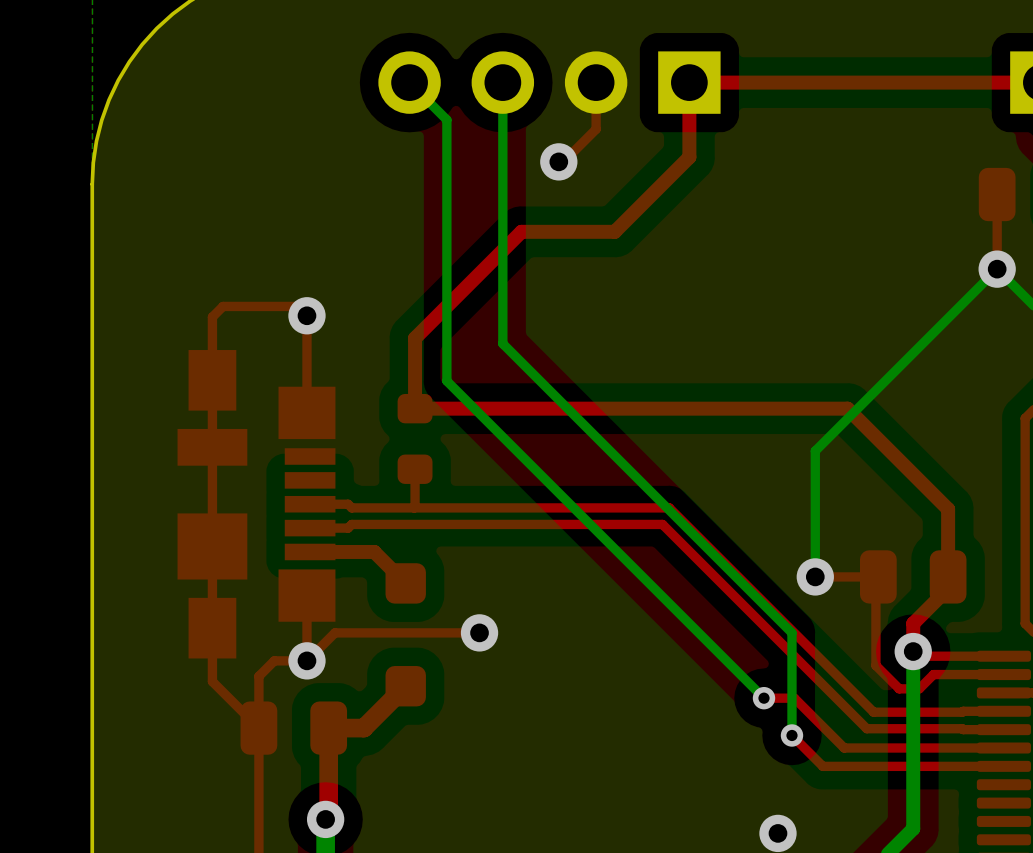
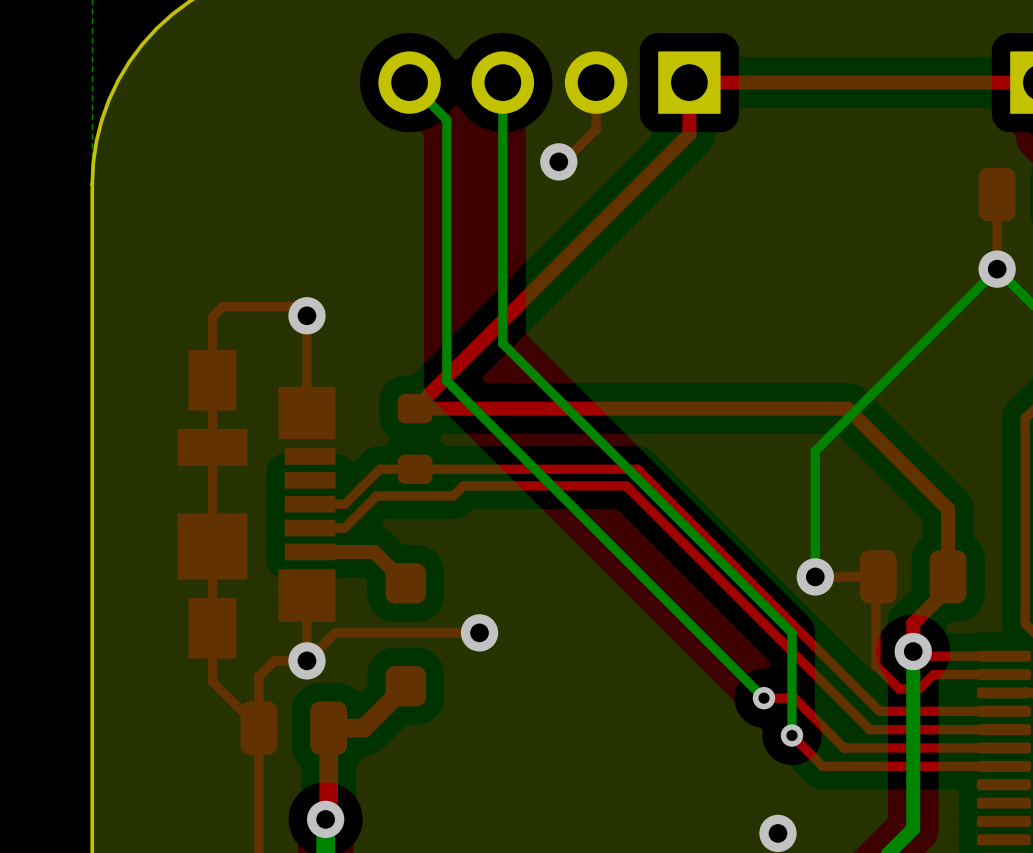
top track: (689, 134) (689, 157) (614, 231) (521, 231) (415, 338) (415, 408) -> (689, 134) (415, 408)
top track: (415, 469) (414, 507) -> none
top track: (344, 504) (348, 504) (351, 507) (669, 507) (873, 712) (963, 711) -> (344, 504) (379, 469) (637, 469) (879, 711) (963, 711)
top track: (344, 528) (348, 528) (351, 524) (662, 524) (866, 728) (963, 729) -> (344, 528) (376, 495) (453, 495) (463, 485) (626, 485) (870, 729) (963, 729)

